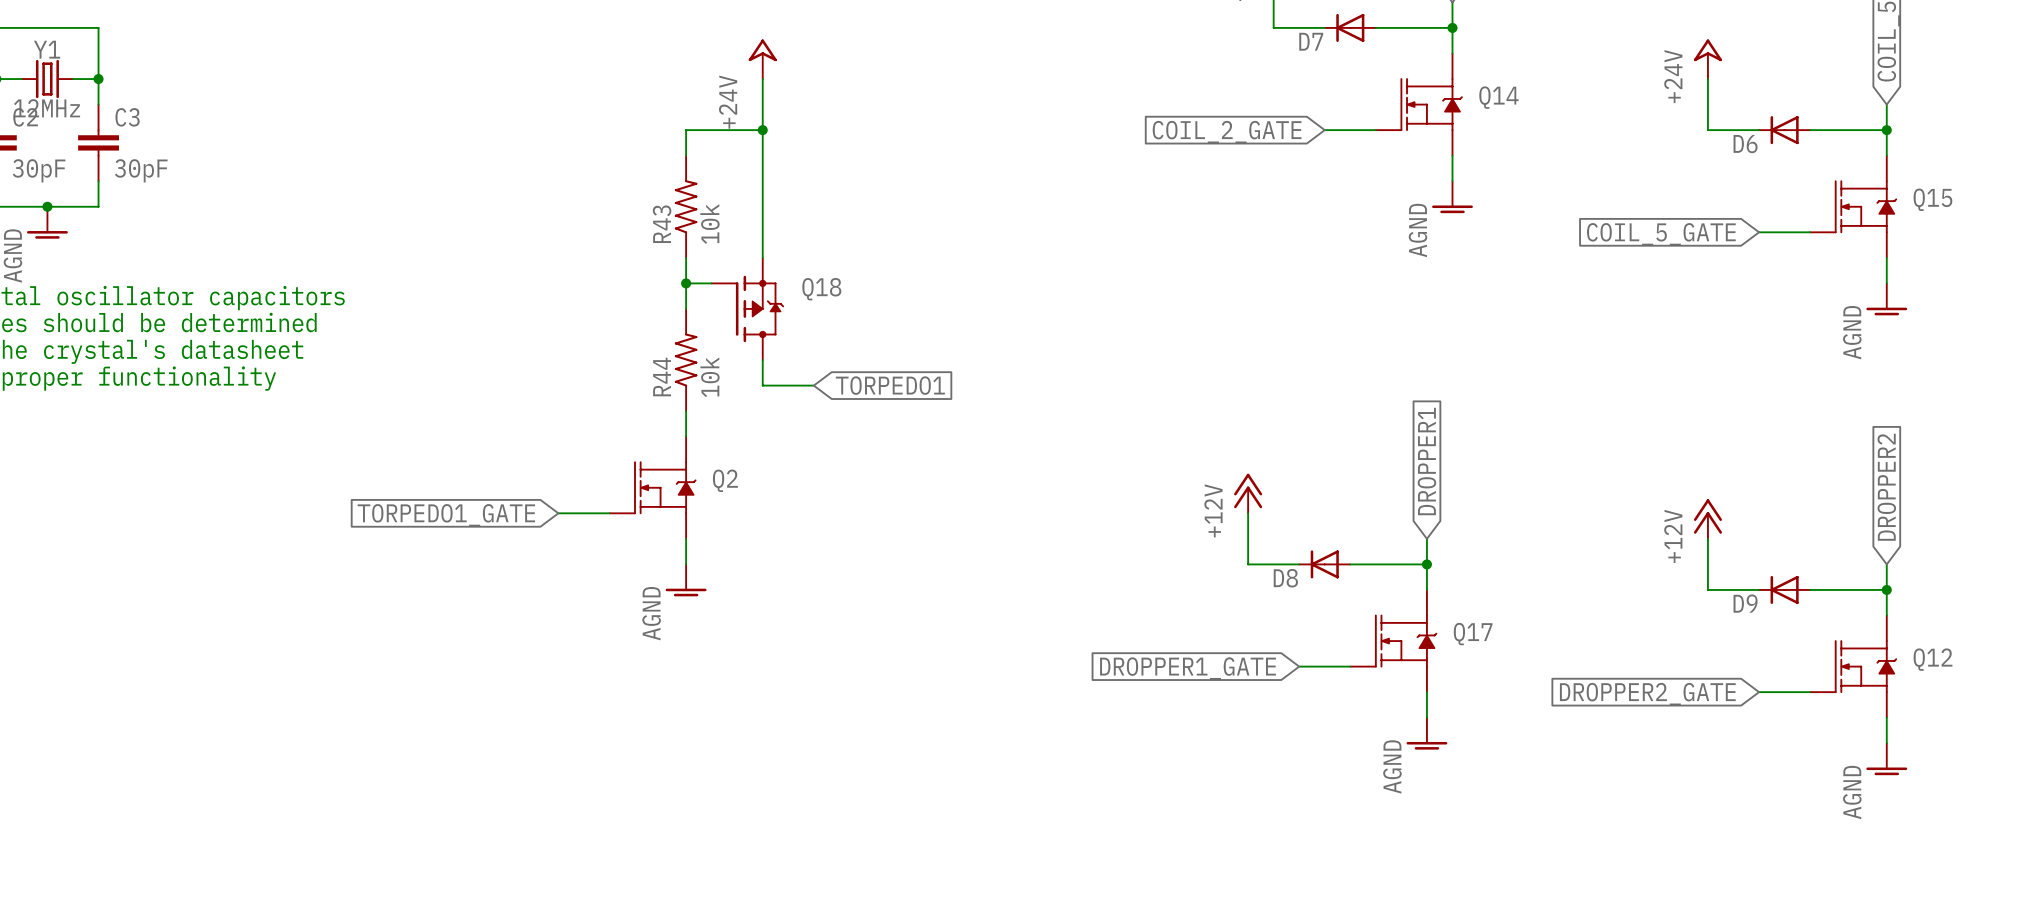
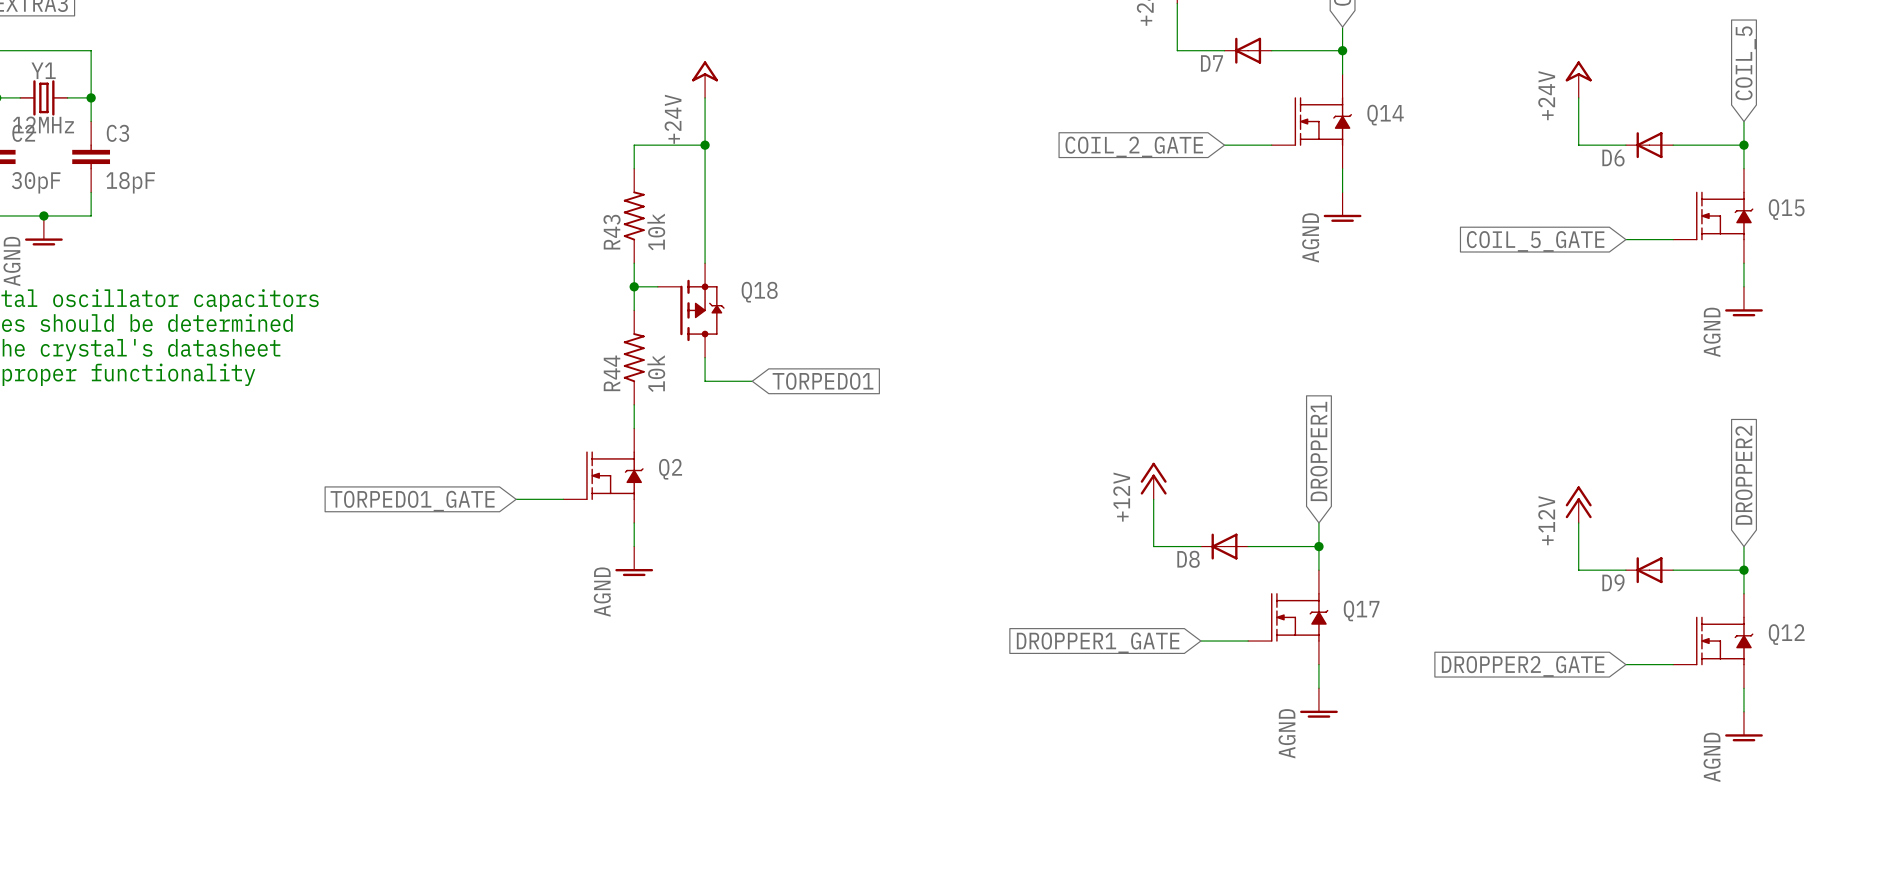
C3 value: 30pF (141, 170) -> 18pF (130, 182)

